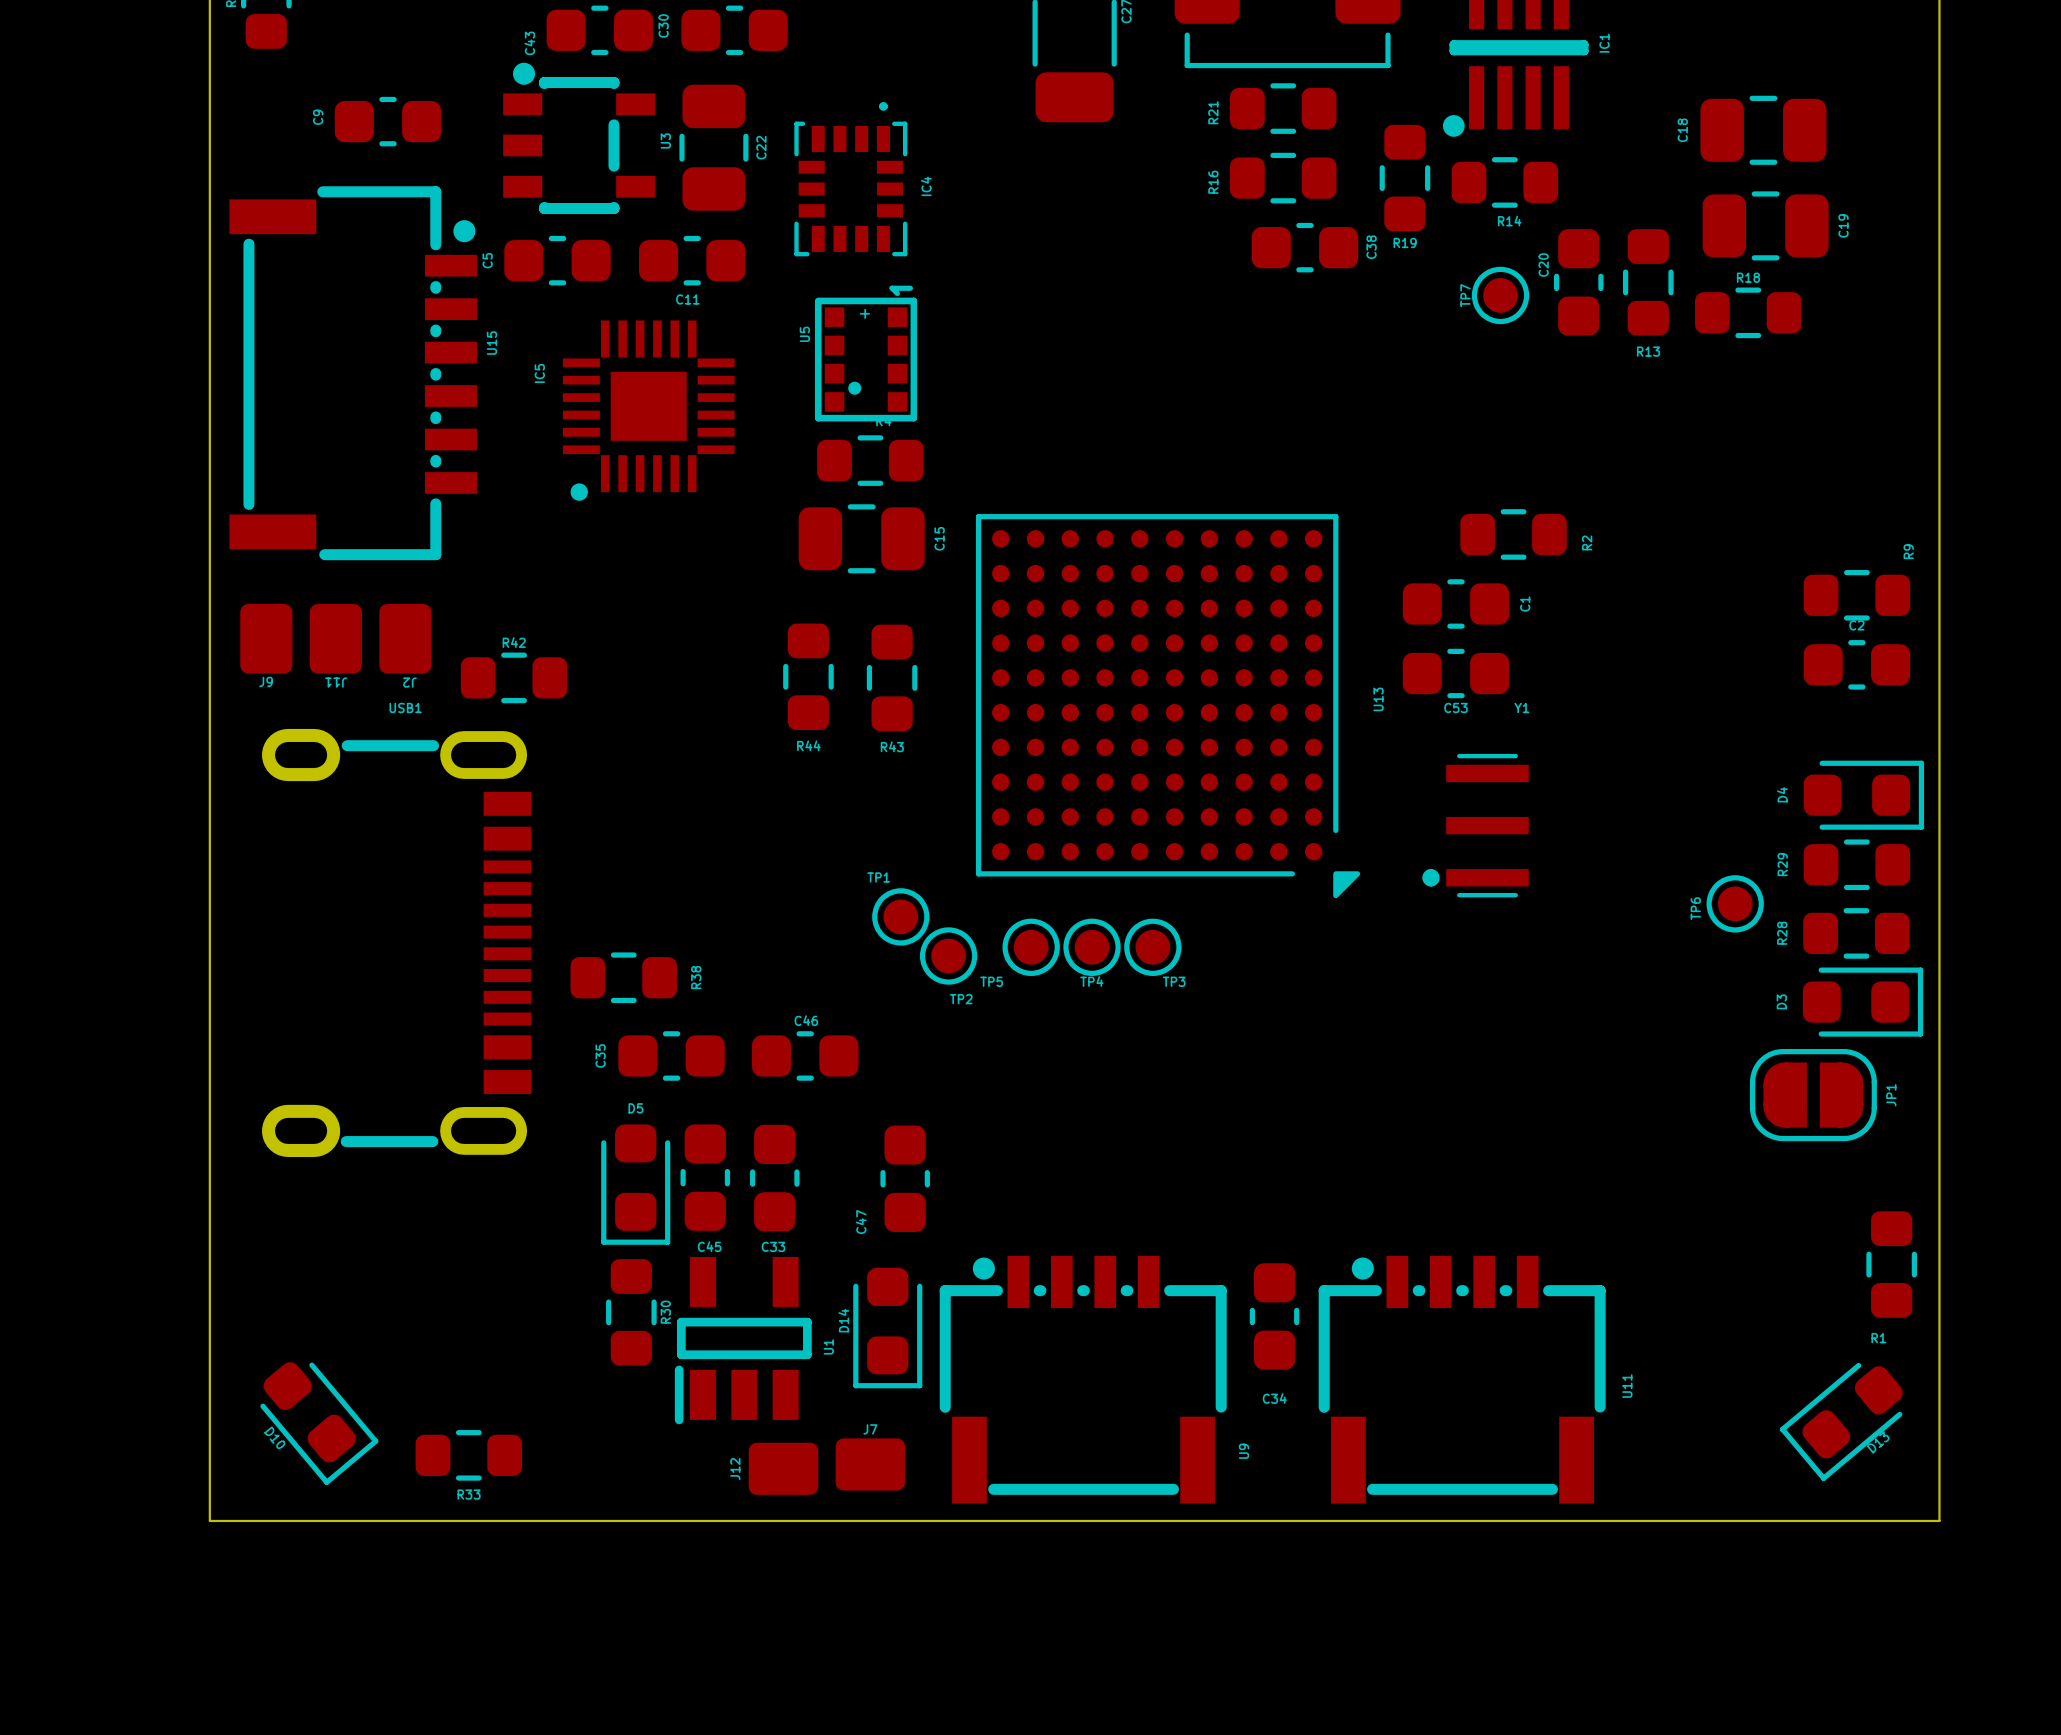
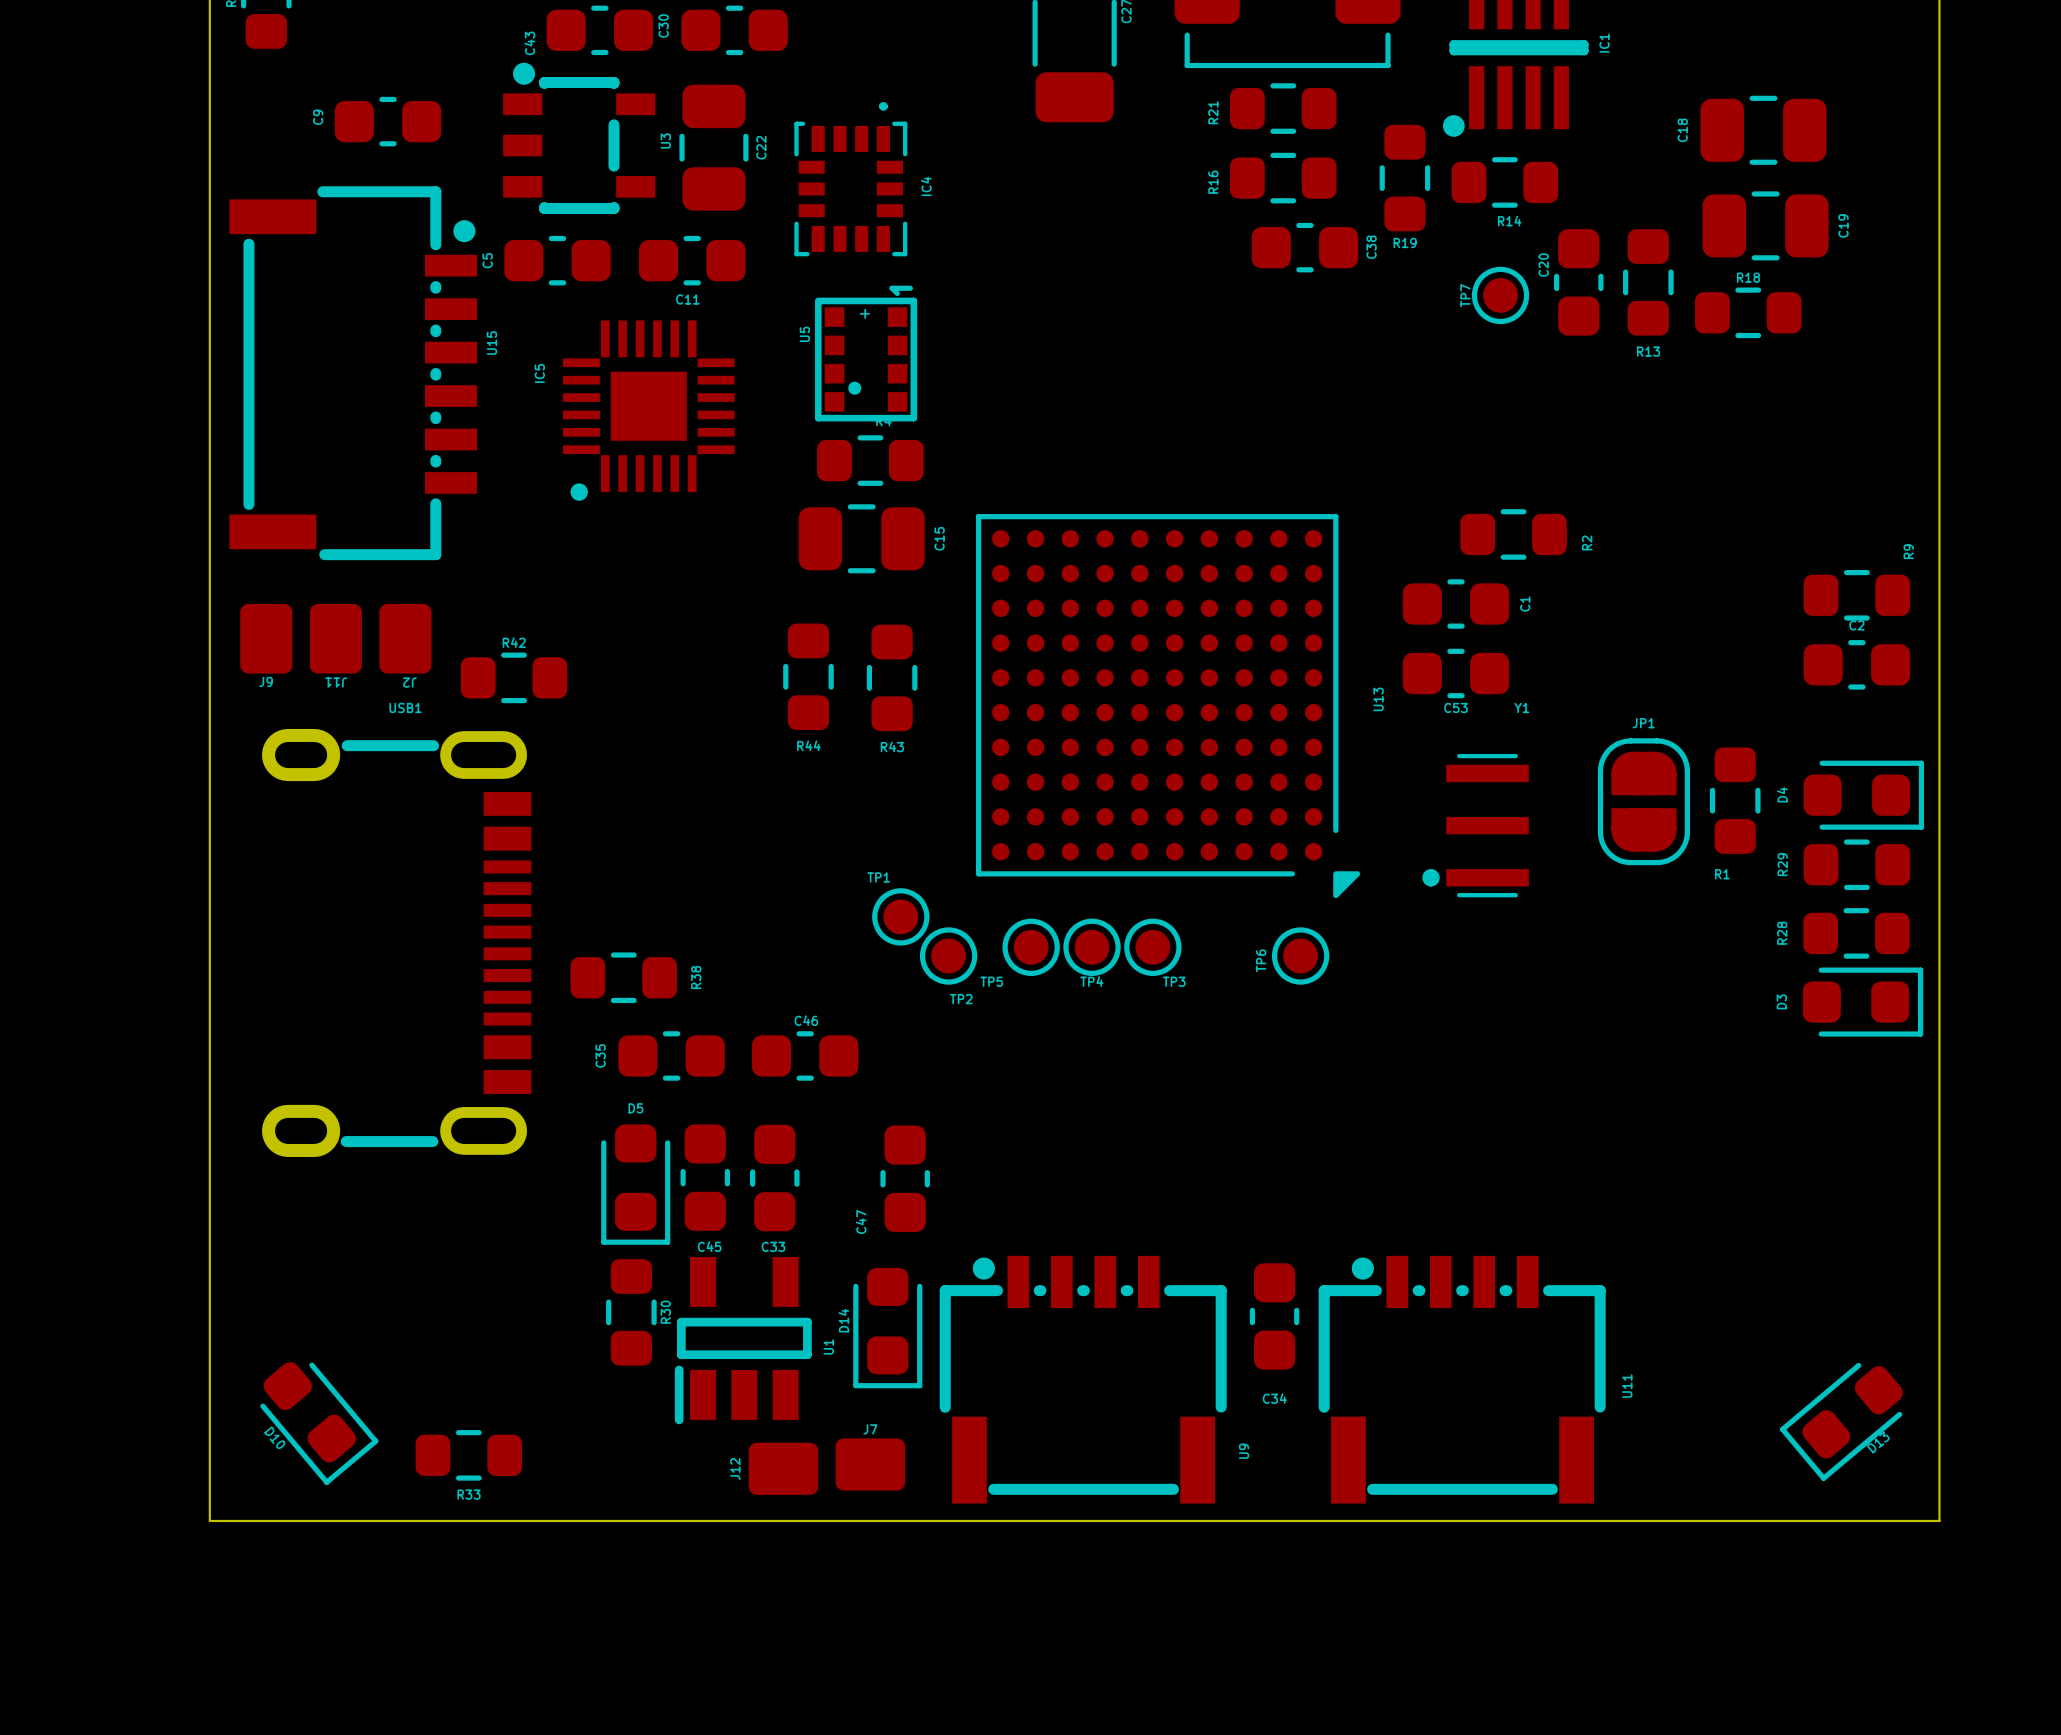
TP6 position: (1735, 903) -> (1300, 956)
JP1 rotation: 0° (1813, 1095) -> 90° clockwise (1643, 801)
JP1 position: (1813, 1095) -> (1643, 801)
JP1 name position: JP1 (1891, 1095) -> JP1 (1643, 723)
R1 position: (1891, 1264) -> (1735, 800)

